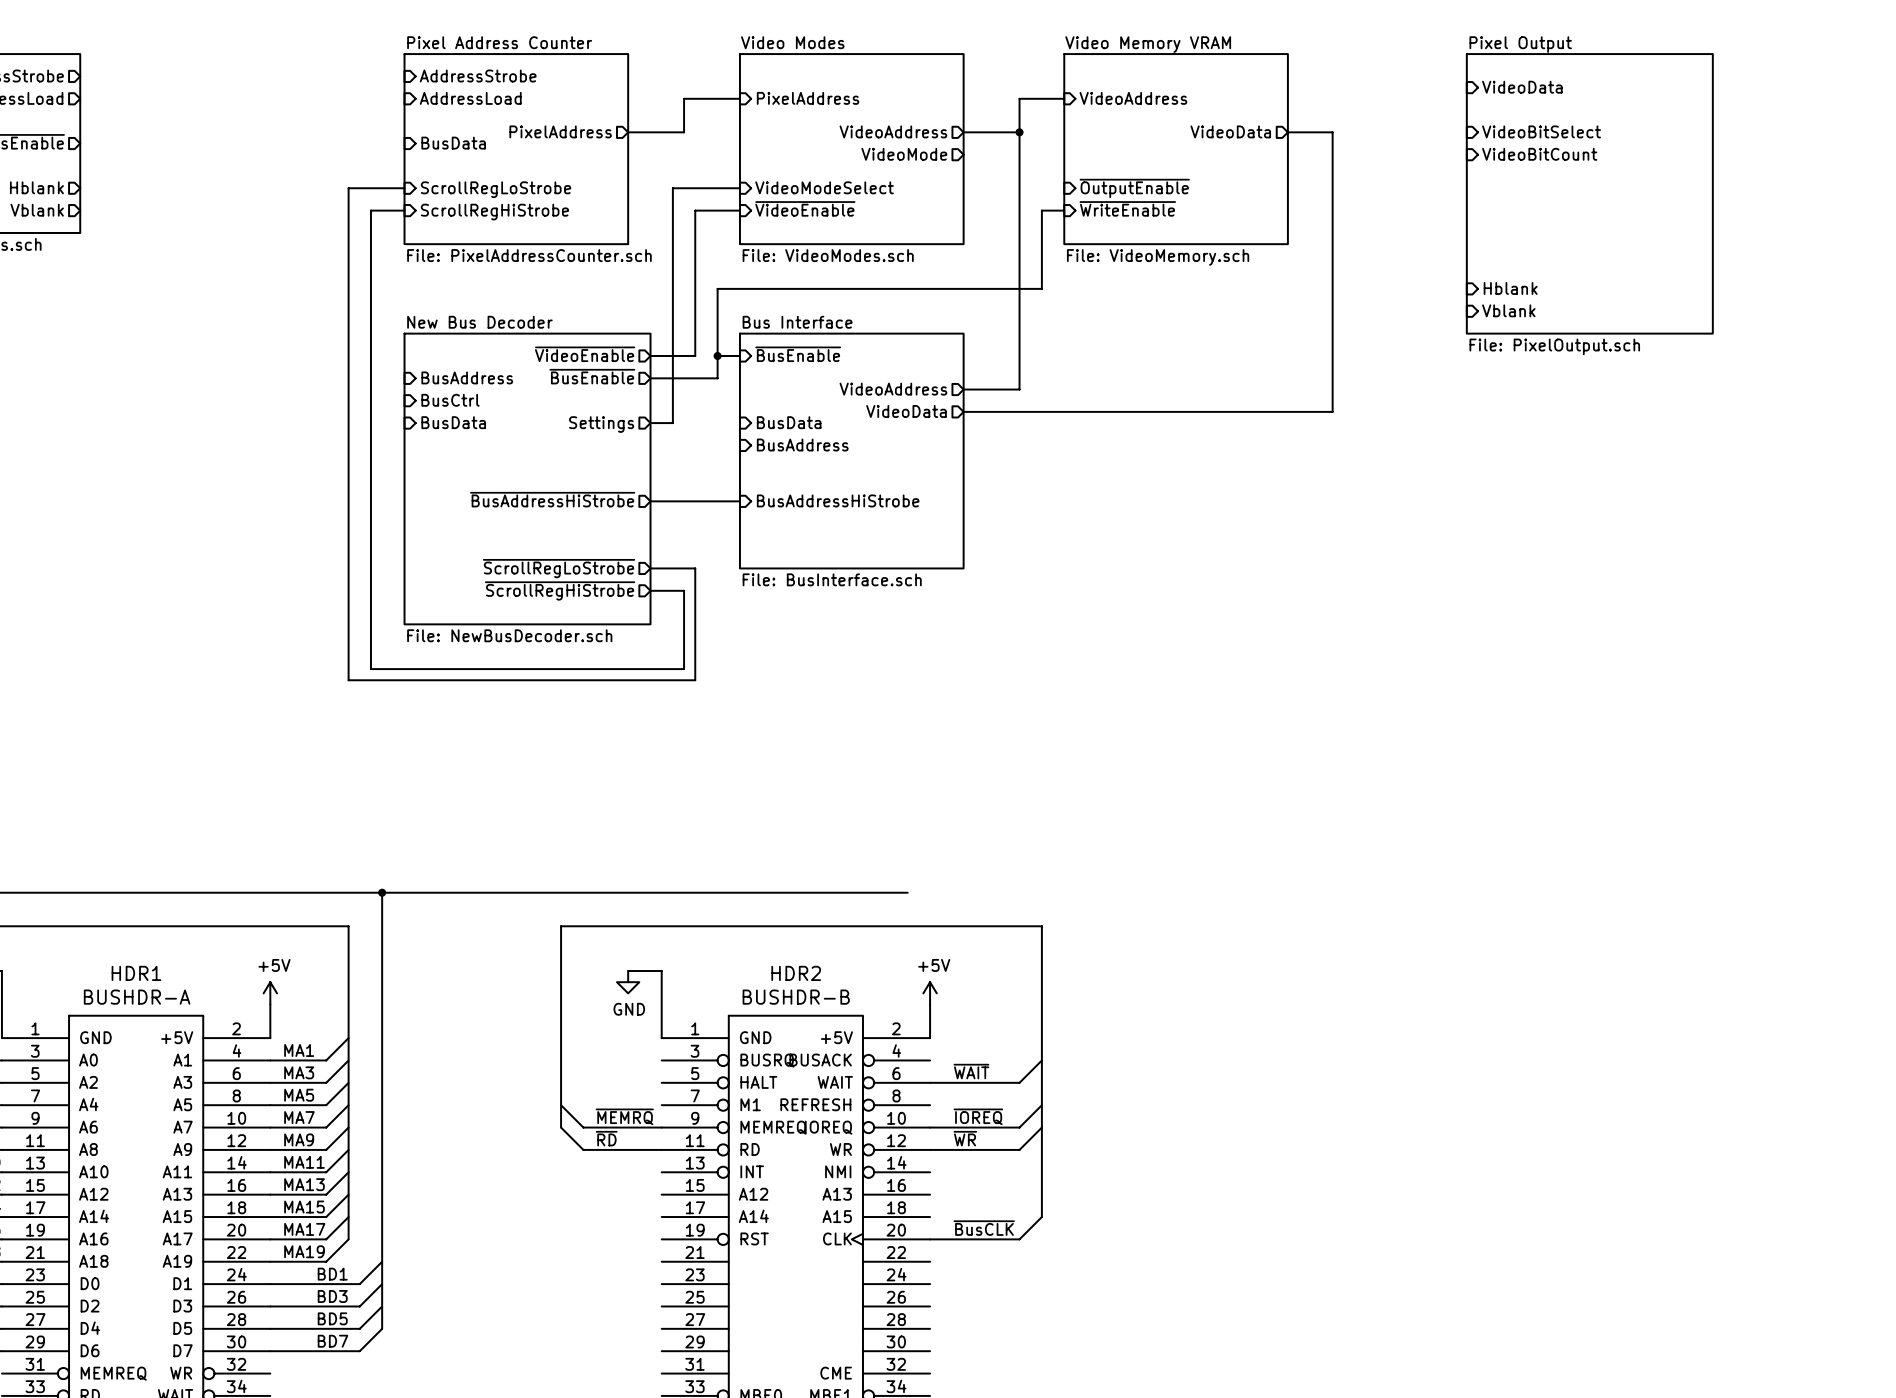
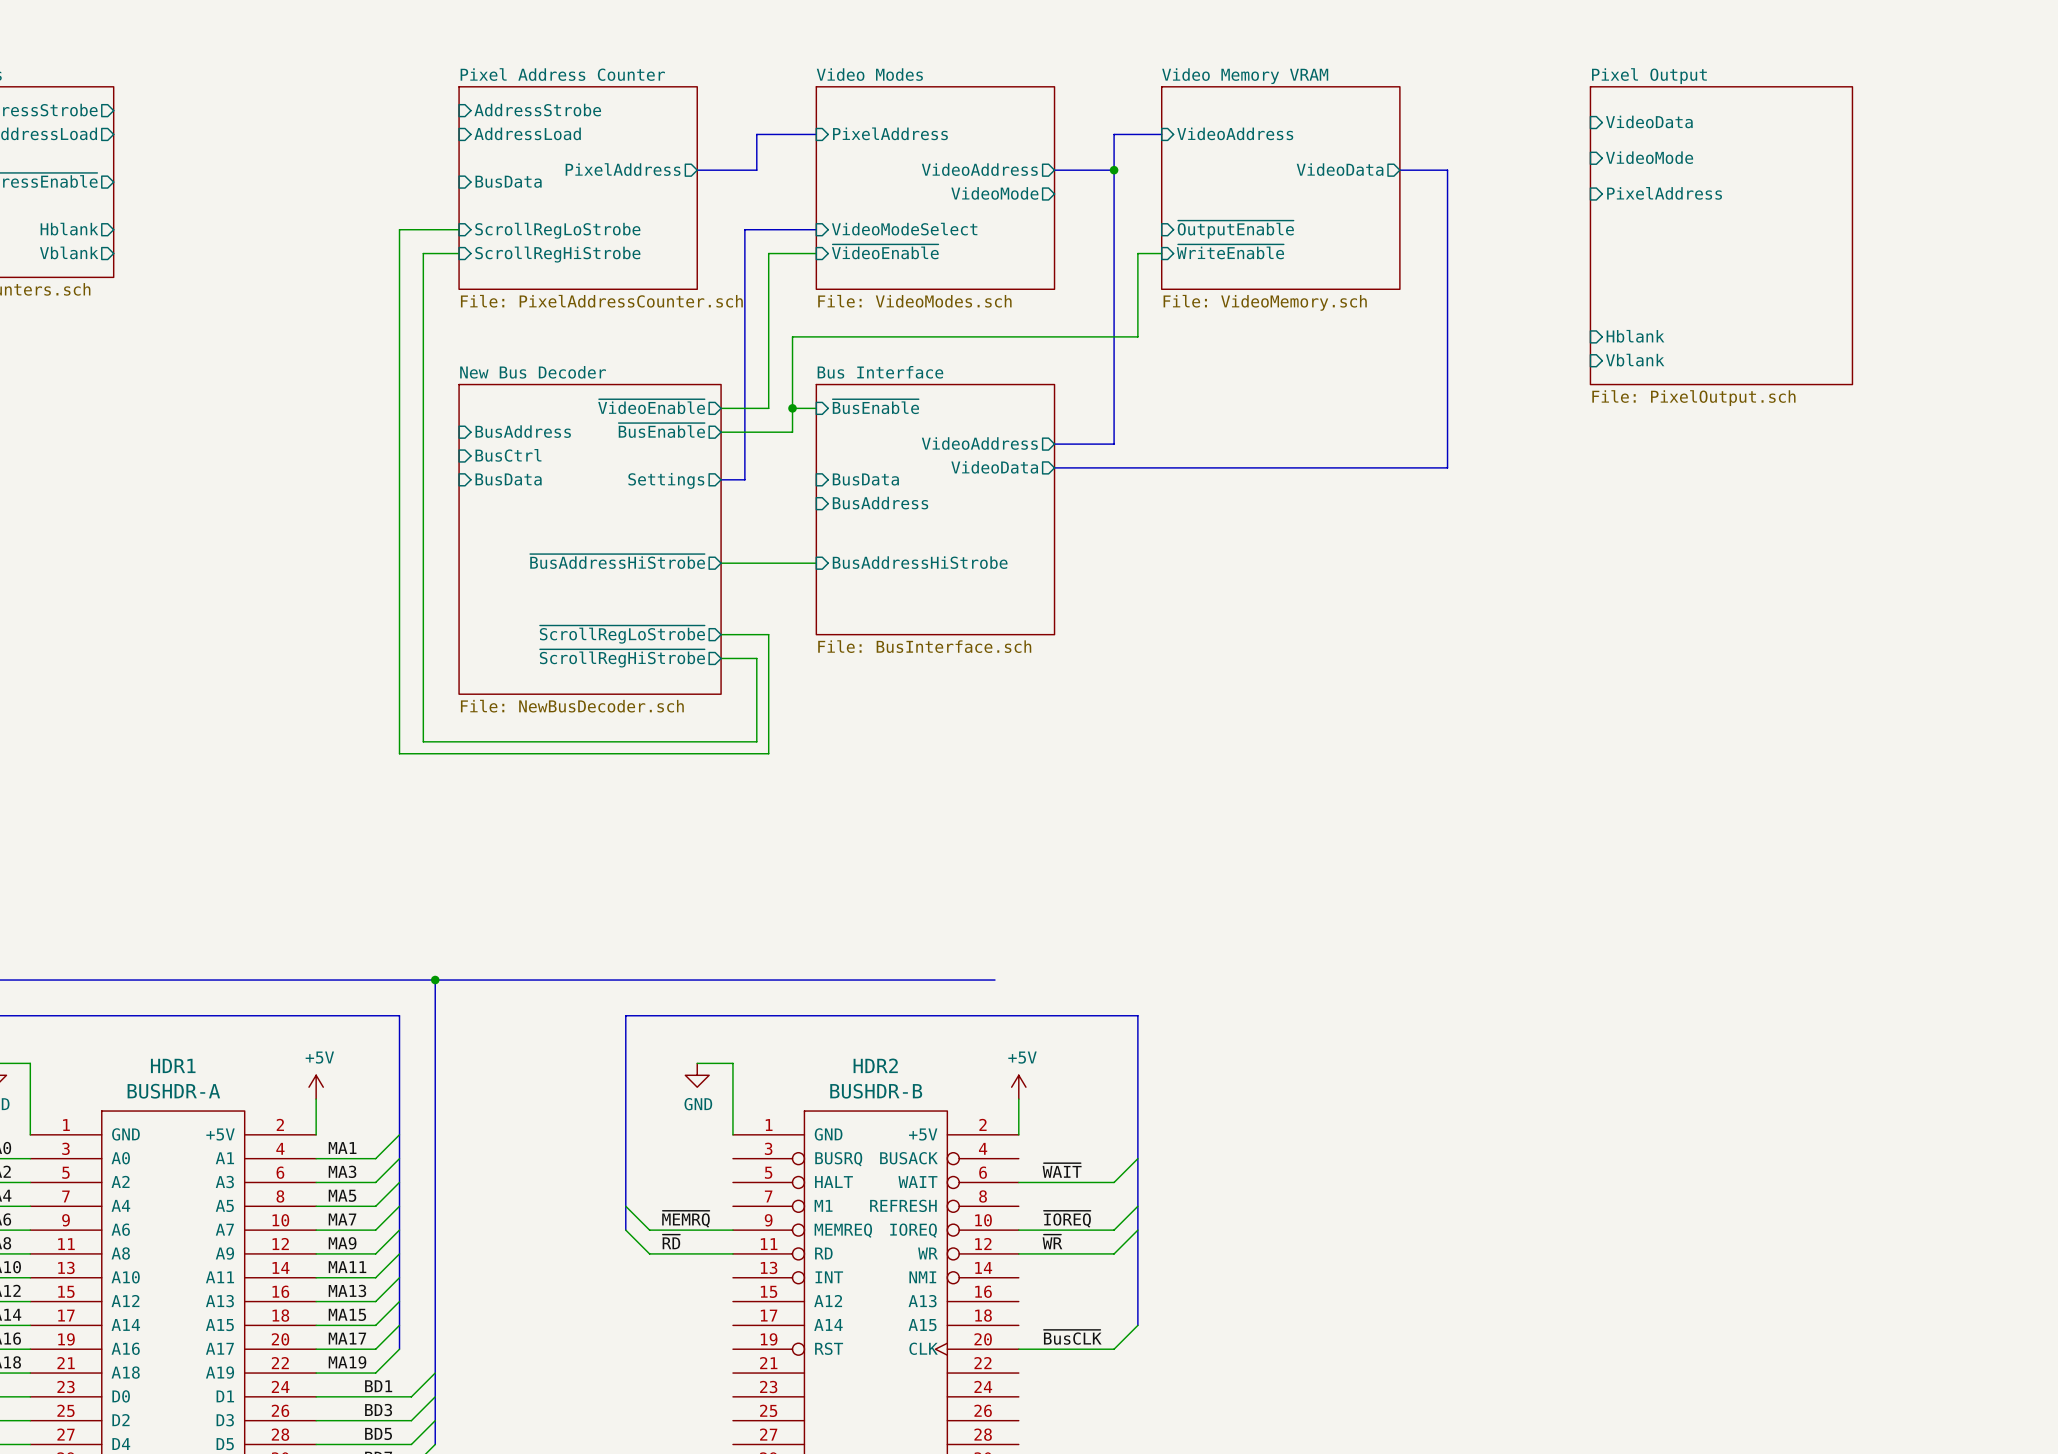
sheet pin: none -> VideoMode (1649, 157)
sheet pin: VideoBitSelect (1541, 131) -> none
sheet pin: VideoBitCount (1539, 154) -> PixelAddress (1664, 193)

